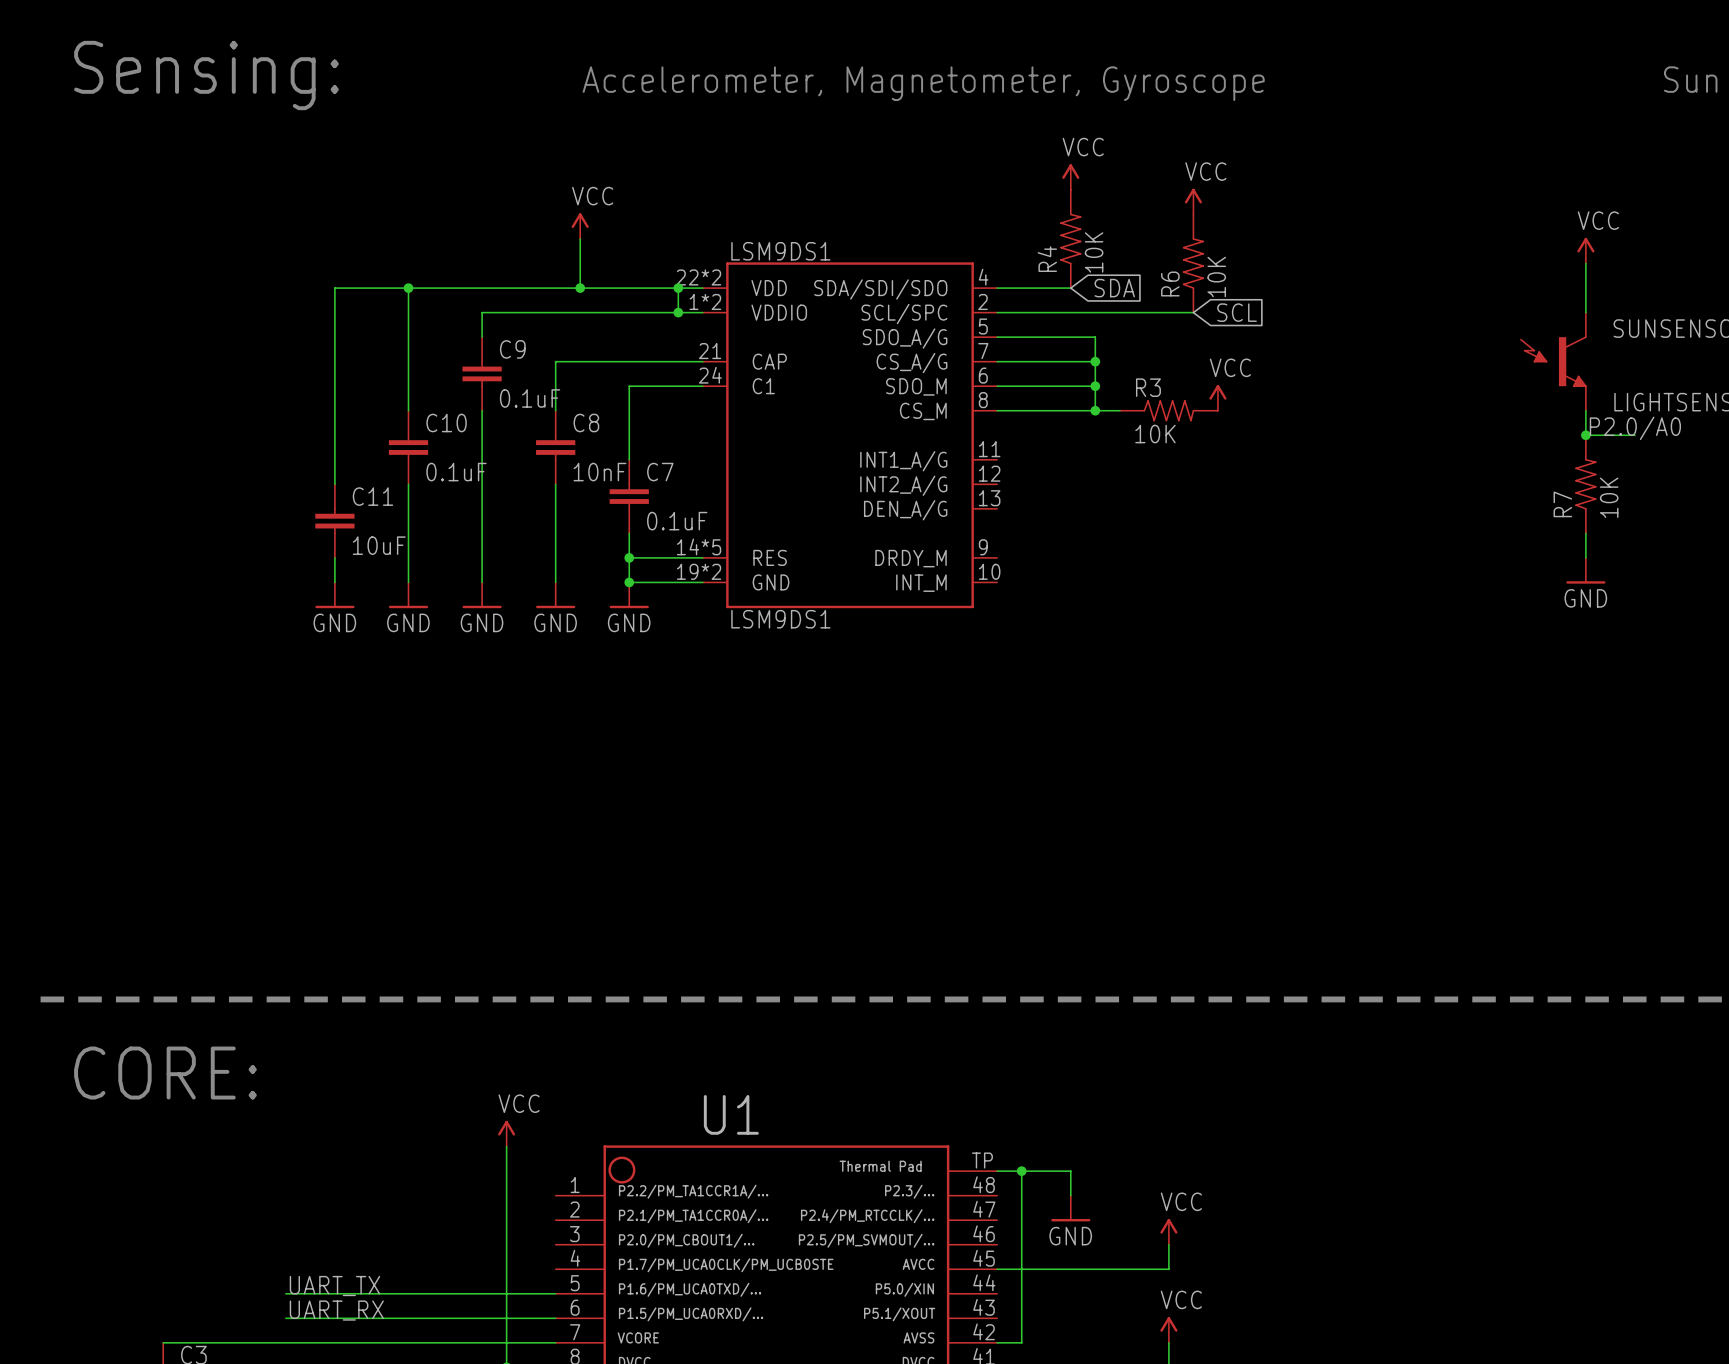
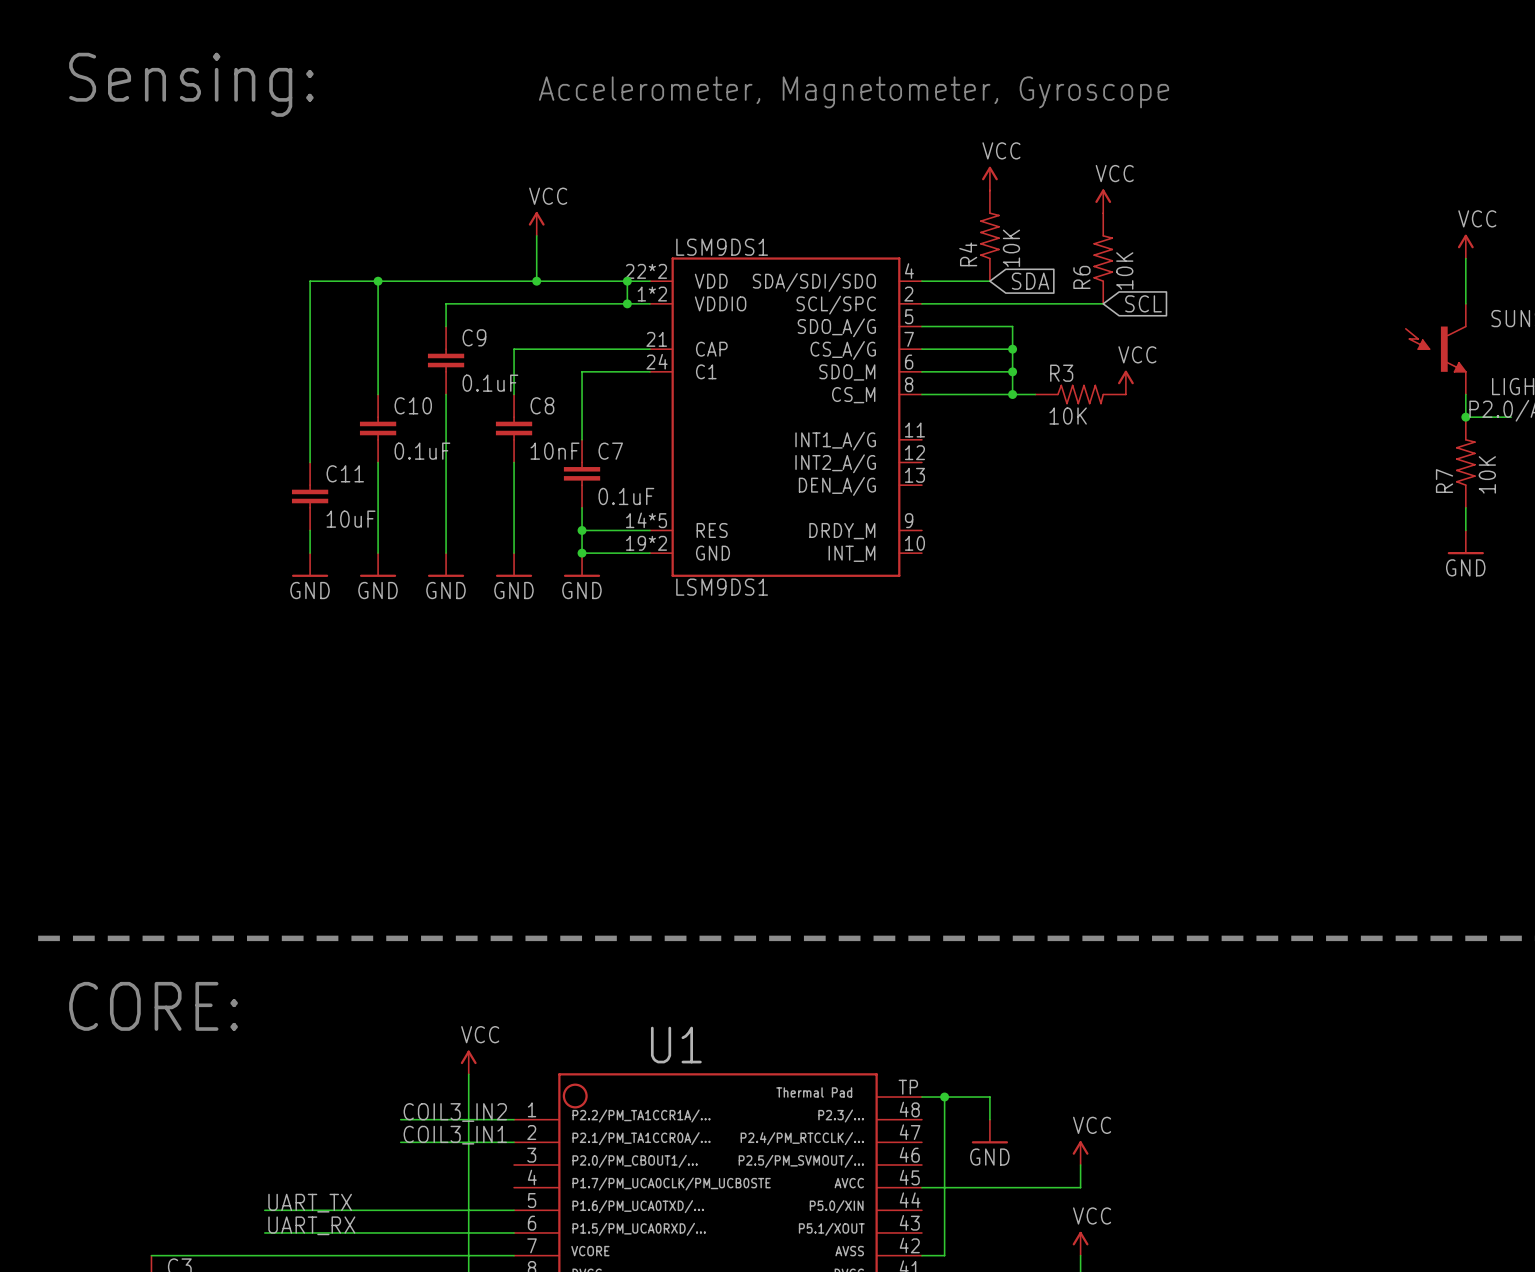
label: none -> COIL3_IN2 (455, 1112)
wire: none -> (400, 1119) (514, 1119)
label: none -> COIL3_IN1 (455, 1135)
wire: none -> (400, 1142) (514, 1142)

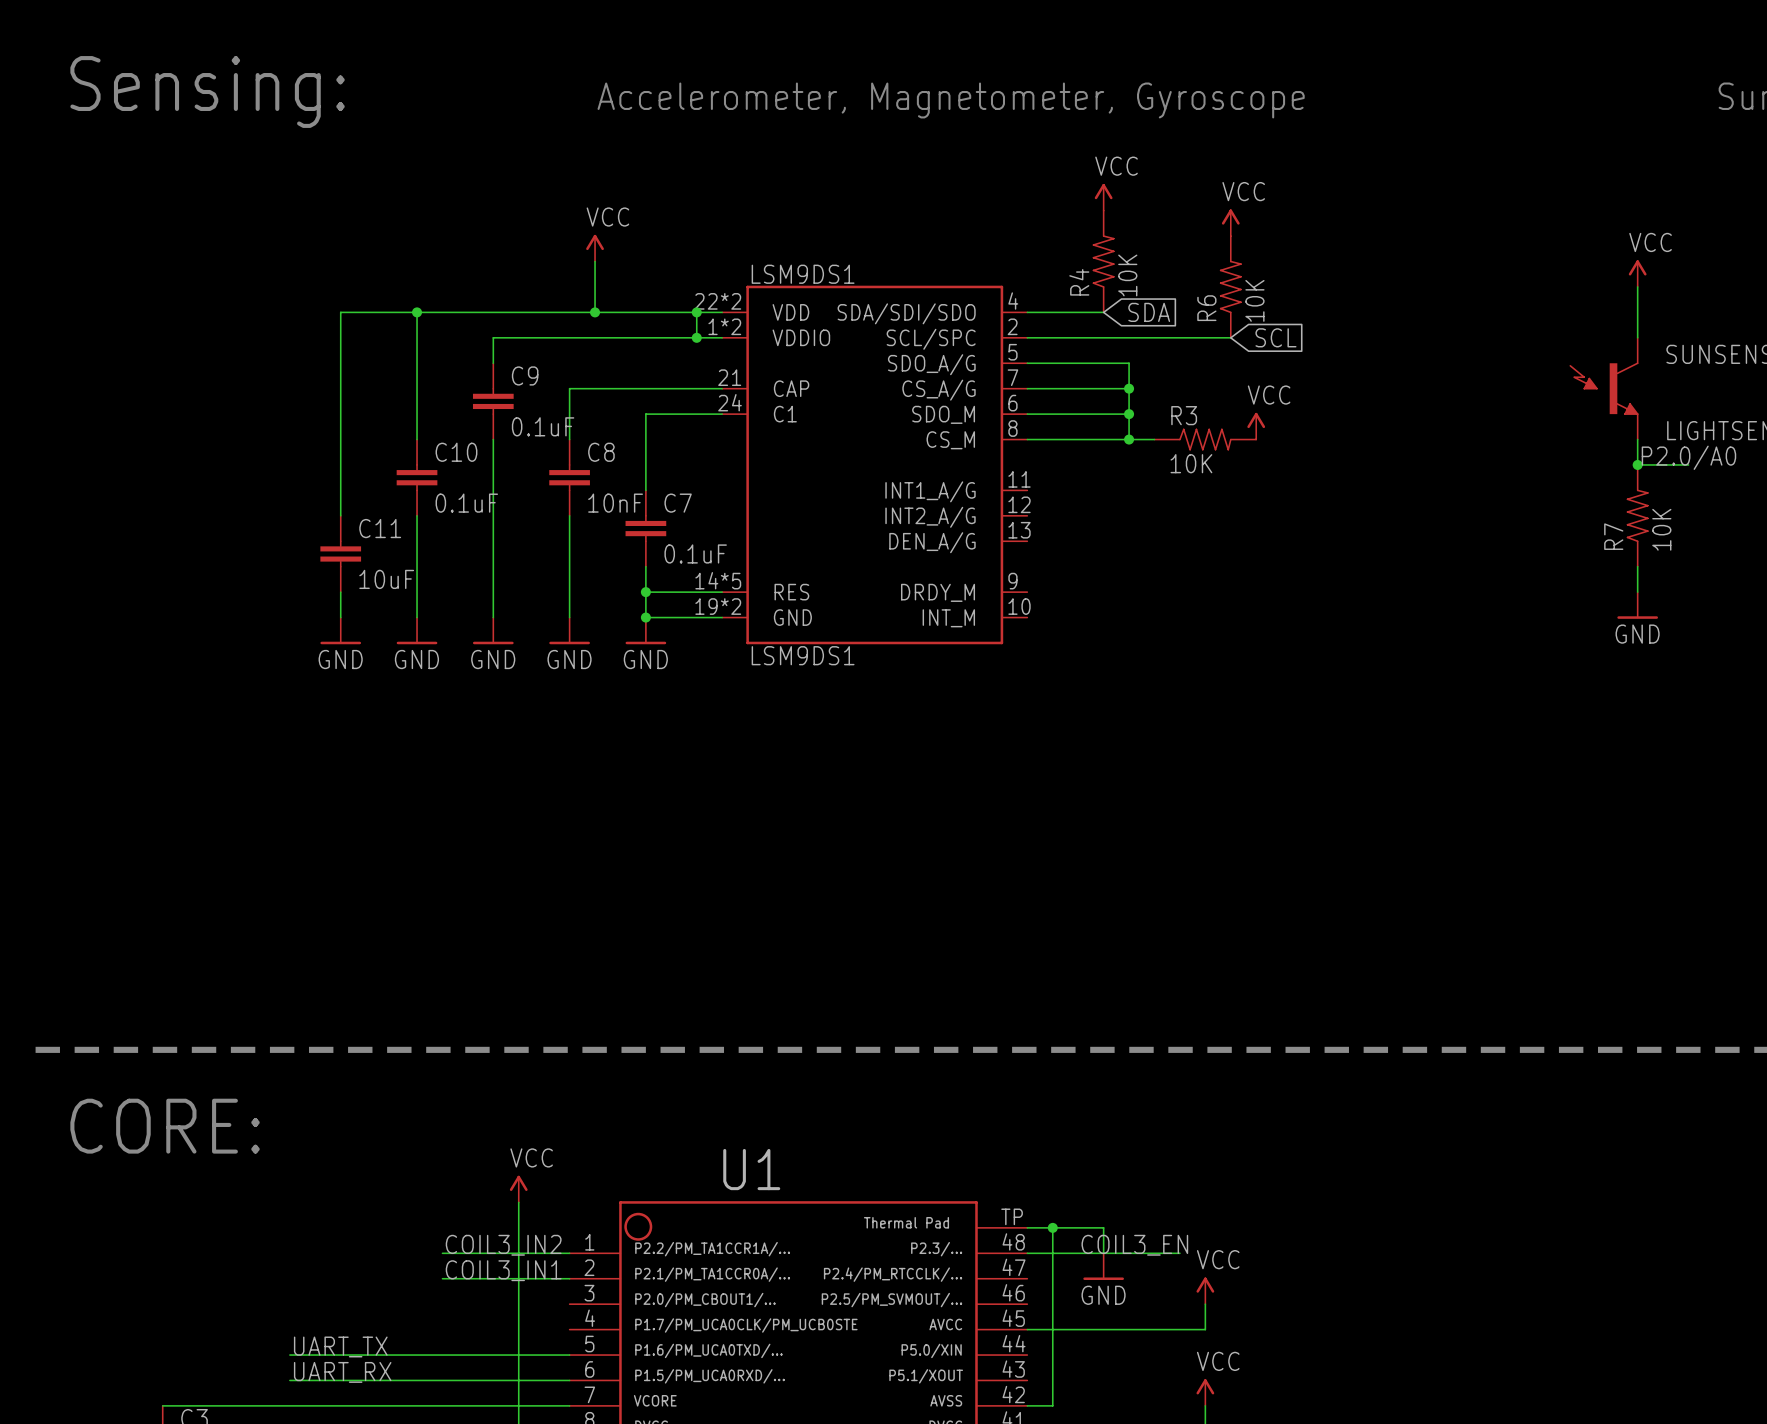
label: none -> COIL3_EN (1134, 1245)
wire: none -> (1027, 1253) (1179, 1253)

